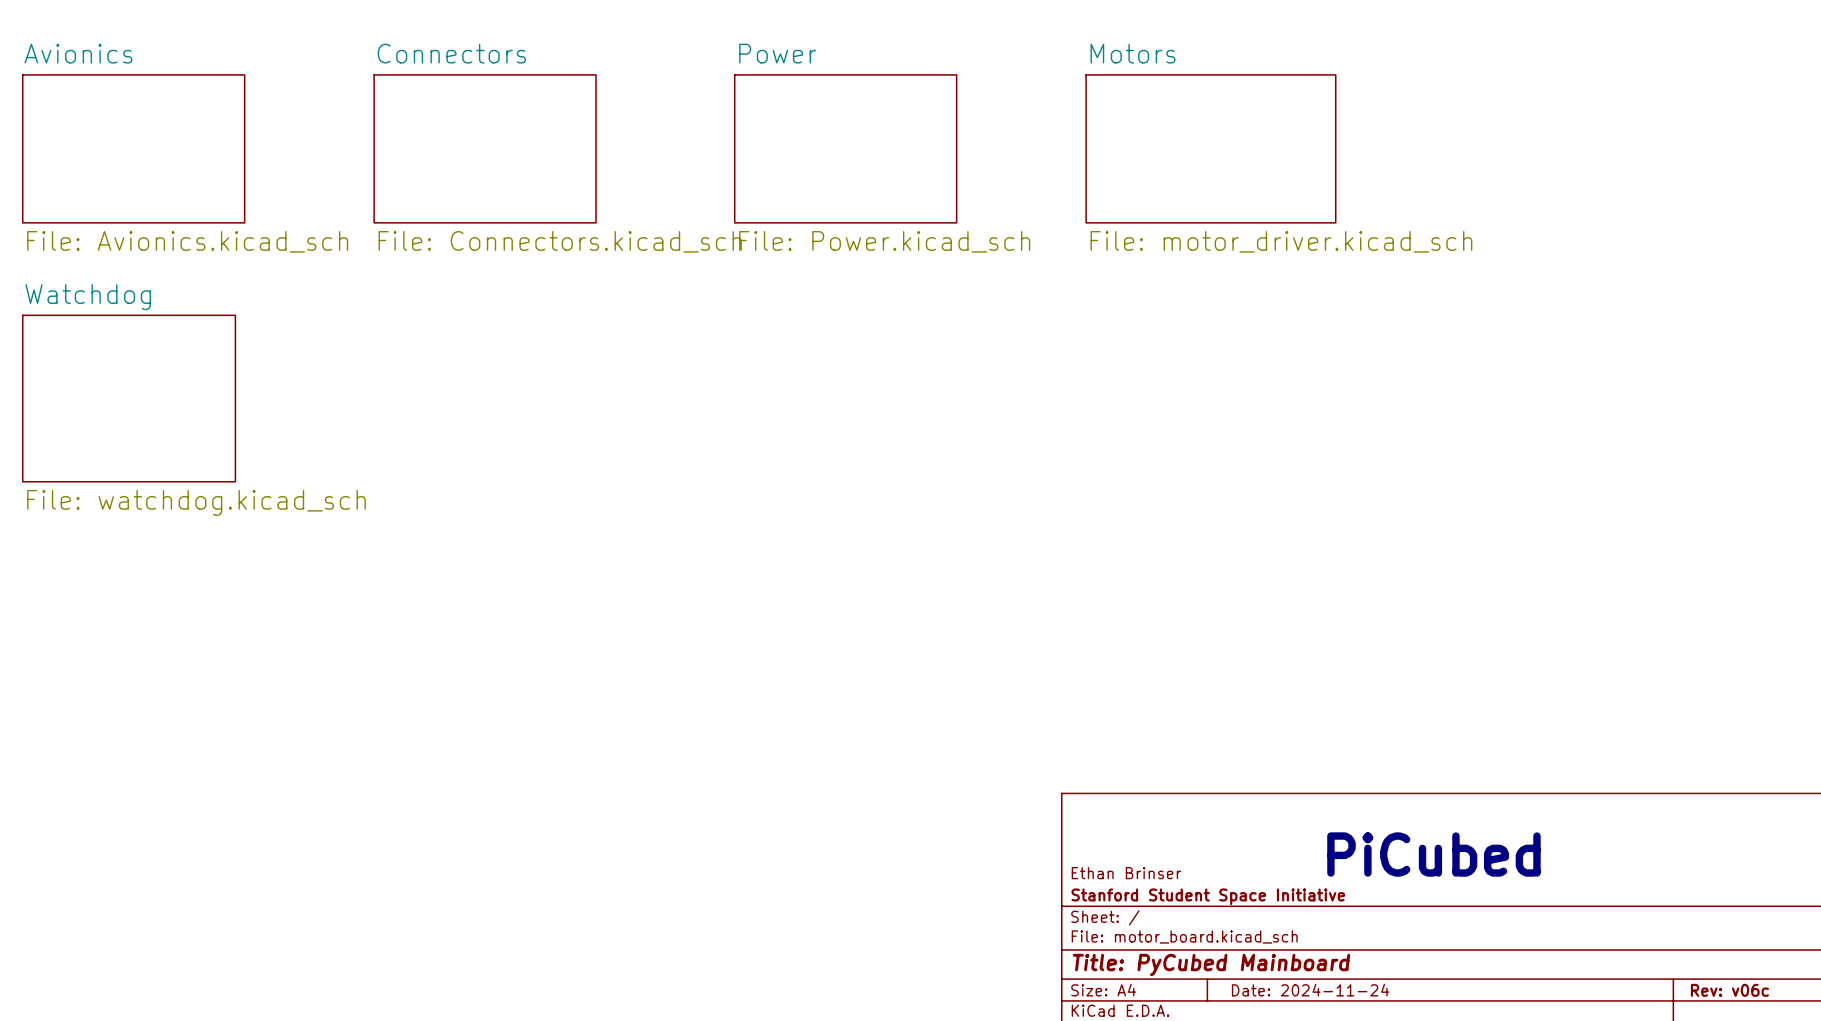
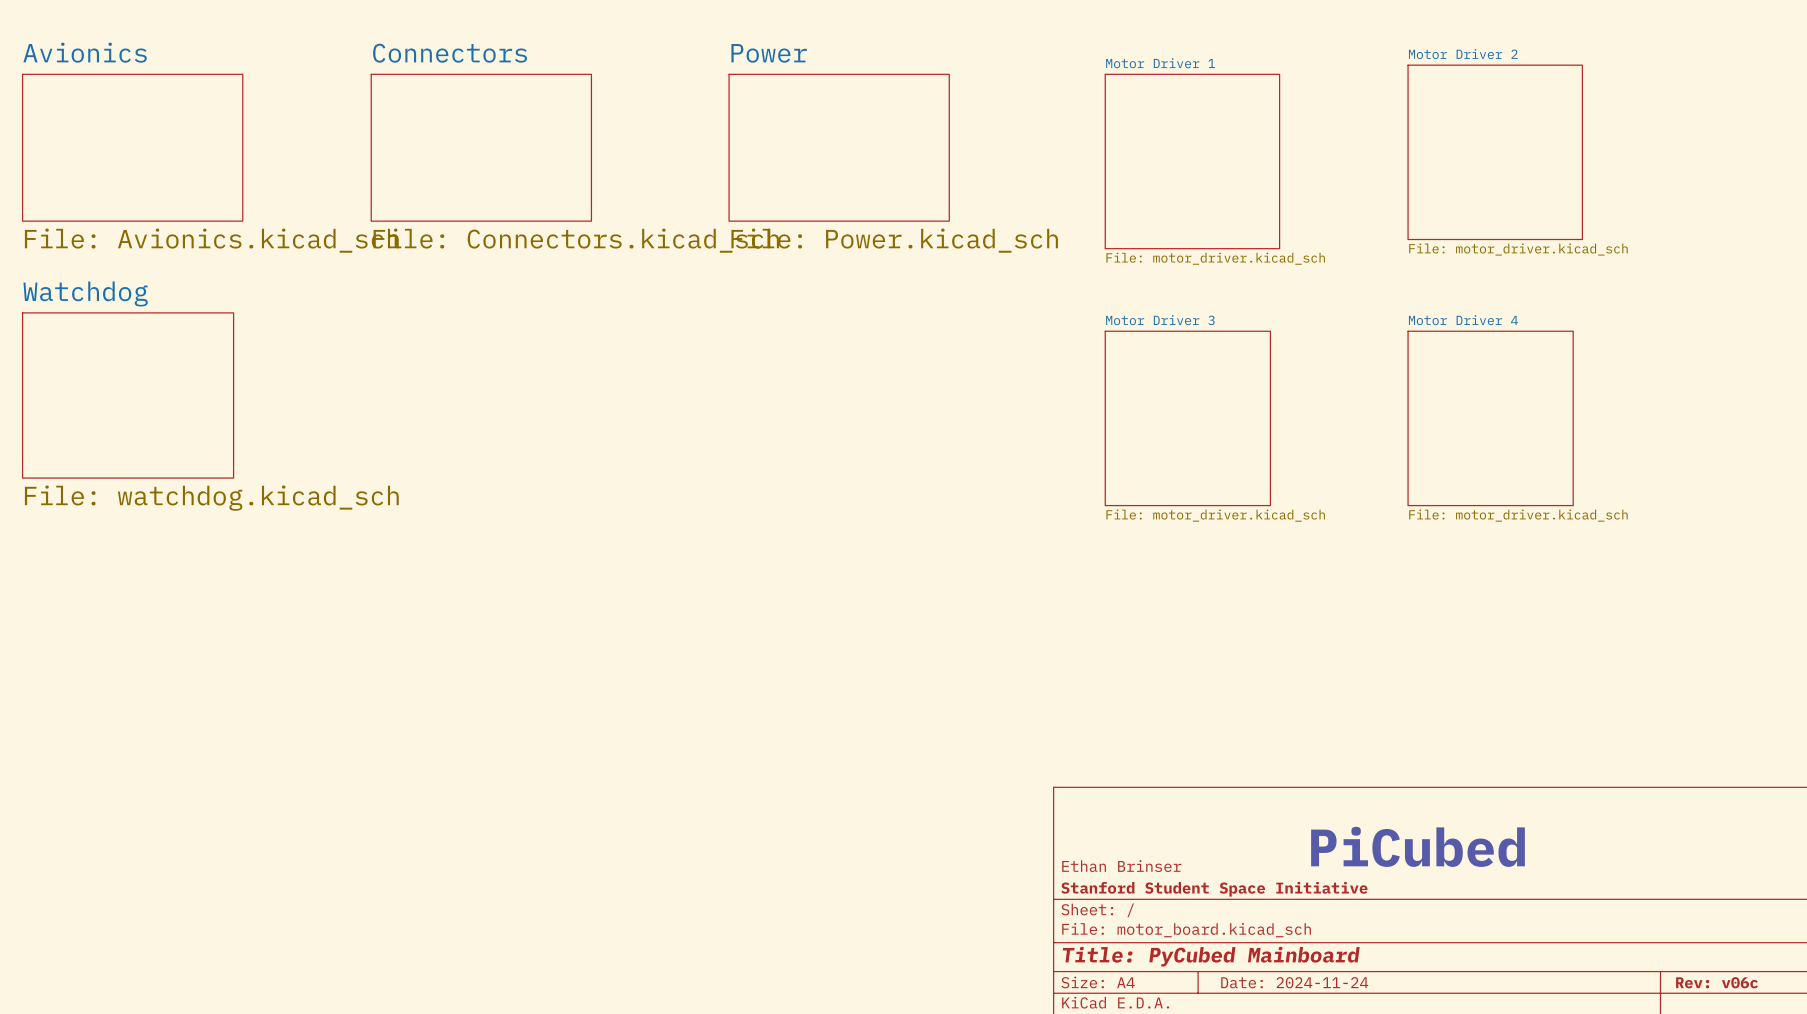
sheet Motors: File: motor_driver.kicad_sch (1210, 148) -> none
sheet Motor Driver 2: none -> File: motor_driver.kicad_sch (1495, 152)
sheet Motor Driver 1: none -> File: motor_driver.kicad_sch (1192, 161)
sheet Motor Driver 3: none -> File: motor_driver.kicad_sch (1187, 418)
sheet Motor Driver 4: none -> File: motor_driver.kicad_sch (1490, 418)

